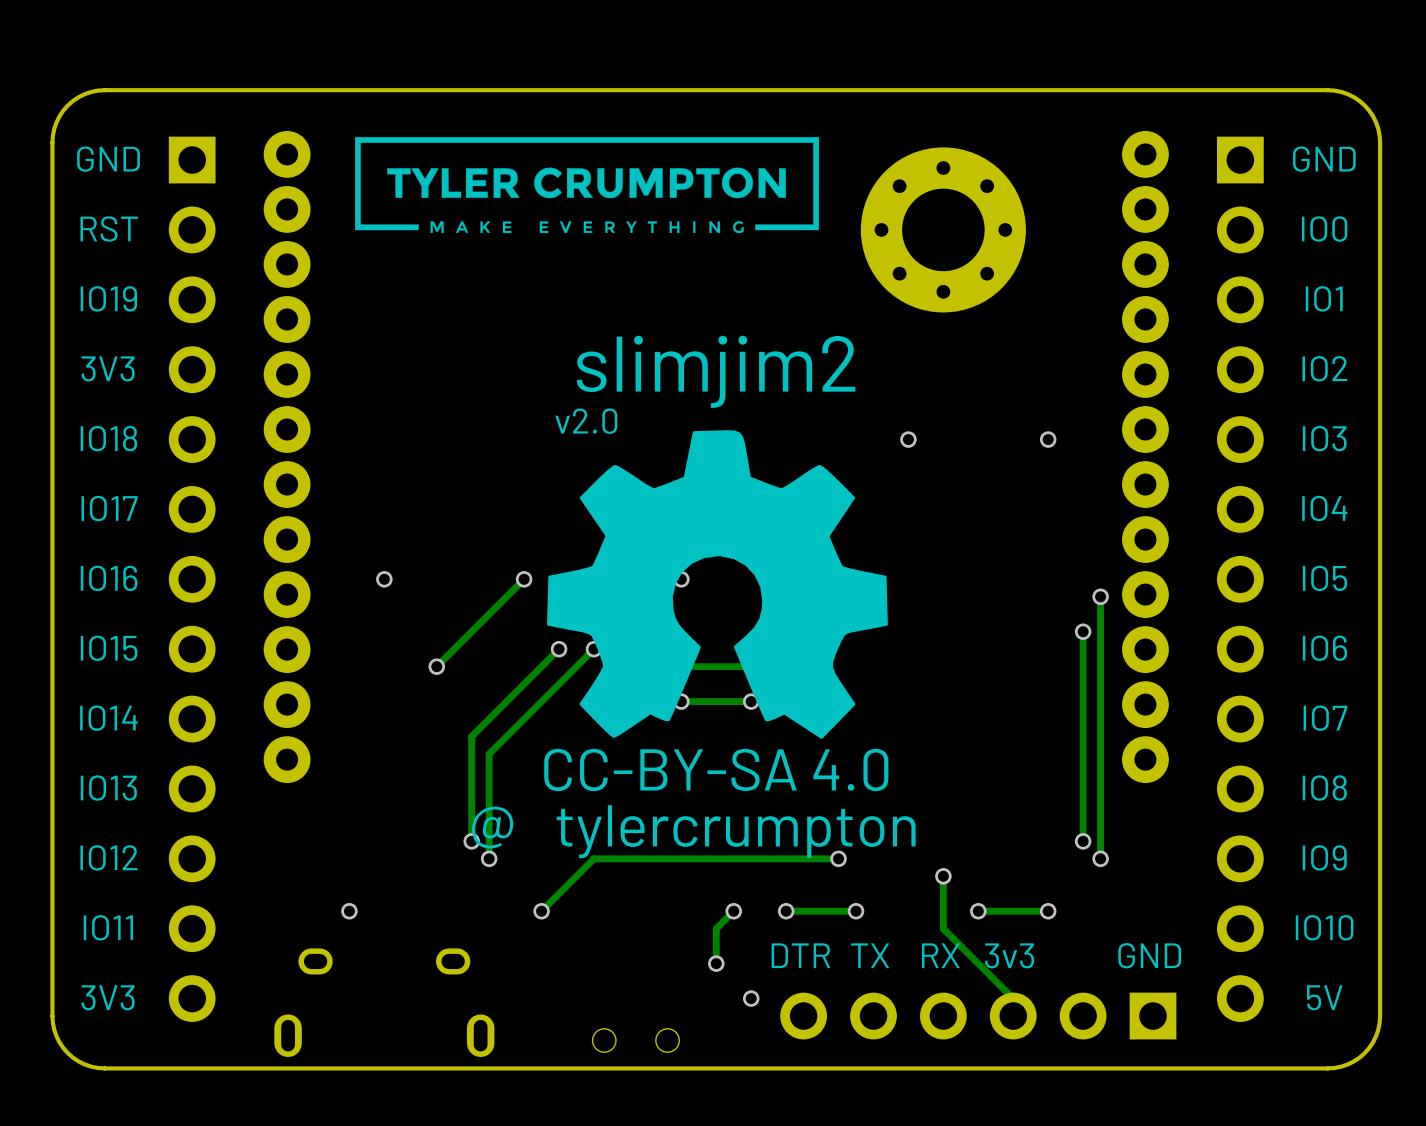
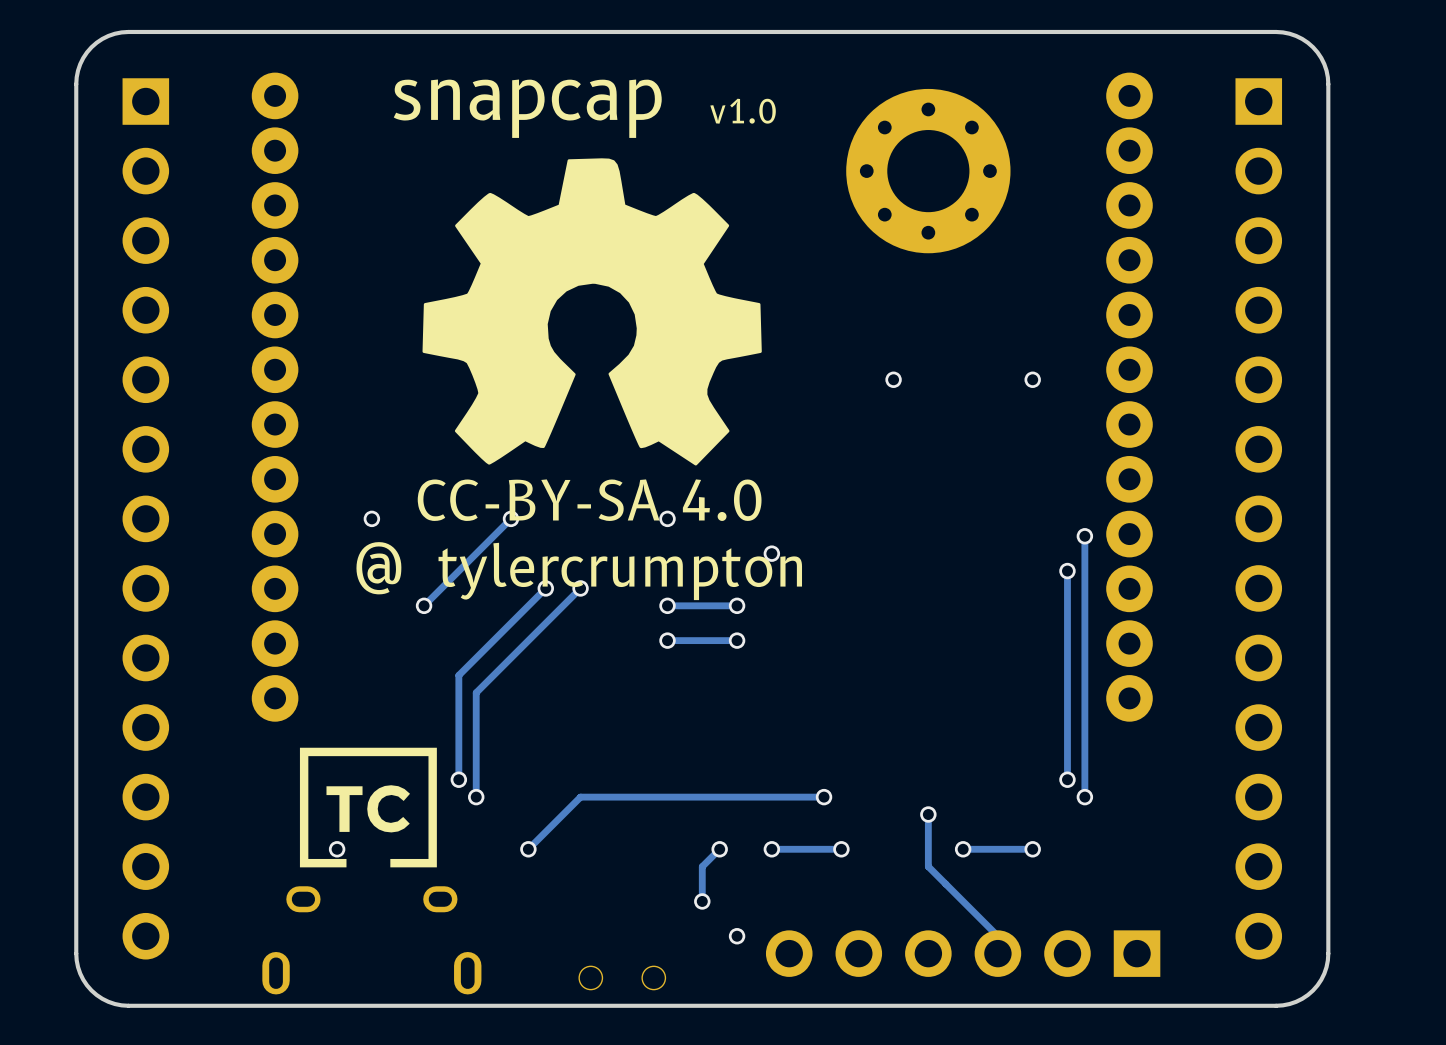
board edge: (139, 90) (98, 90) (78, 97) (67, 105) (59, 116) (54, 129) (52, 142) (52, 1022) (59, 1042) (67, 1053) (78, 1061) (98, 1068) (139, 1068) -> (128, 31) (108, 35) (91, 47) (80, 64) (76, 84) (76, 953) (80, 973) (91, 990) (108, 1001) (128, 1005)
board edge: (1292, 90) (1334, 90) (1353, 97) (1364, 105) (1373, 116) (1378, 129) (1380, 142) (1379, 1022) (1373, 1042) (1364, 1053) (1353, 1061) (1334, 1068) (1292, 1068) -> (1276, 31) (1296, 35) (1313, 47) (1324, 64) (1328, 84) (1328, 953) (1324, 973) (1313, 990) (1296, 1001) (1276, 1005)
drawing: [354, 137, 820, 234] -> none
text: GND (108, 159) -> none
text: GND (1324, 159) -> none
text: none -> snapcap (527, 108)
text: none -> v1.0 (743, 111)
text: RST (109, 229) -> none
text: IO0 (1324, 229) -> none
text: IO19 (108, 298) -> none
text: IO1 (1324, 298) -> none
text: 3V3 (108, 368) -> none
text: IO2 (1324, 368) -> none
text: slimjim2 (716, 371) -> none
text: v2.0 (586, 421) -> none
text: IO18 (108, 438) -> none
text: IO3 (1324, 438) -> none
text: IO17 (109, 508) -> none
text: IO4 (1324, 508) -> none
text: IO16 (109, 578) -> none
text: IO5 (1324, 578) -> none
part position: (192, 579) -> (145, 518)
part position: (1240, 579) -> (1258, 518)
drawing position: (717, 584) -> (592, 311)
text: IO15 (109, 648) -> none
text: IO6 (1324, 648) -> none
text: IO14 (108, 718) -> none
text: IO7 (1325, 718) -> none
text position: CC-BY-SA 4.0 (716, 769) -> CC-BY-SA 4.0 (589, 500)
text: IO8 (1324, 787) -> none
text: IO13 (108, 788) -> none
drawing: none -> [299, 747, 437, 868]
text position: @ (492, 827) -> @ (378, 568)
text position: tylercrumpton (736, 831) -> tylercrumpton (620, 571)
text: IO12 (108, 857) -> none
text: IO9 (1324, 857) -> none
text: IO11 (108, 927) -> none
text: IO10 (1324, 927) -> none
text: DTR (800, 955) -> none
text: TX (870, 955) -> none
text: RX (940, 955) -> none
text: 3v3 (1009, 955) -> none
text: GND (1149, 955) -> none
text: 3V3 (108, 997) -> none
text: 5V (1324, 997) -> none

